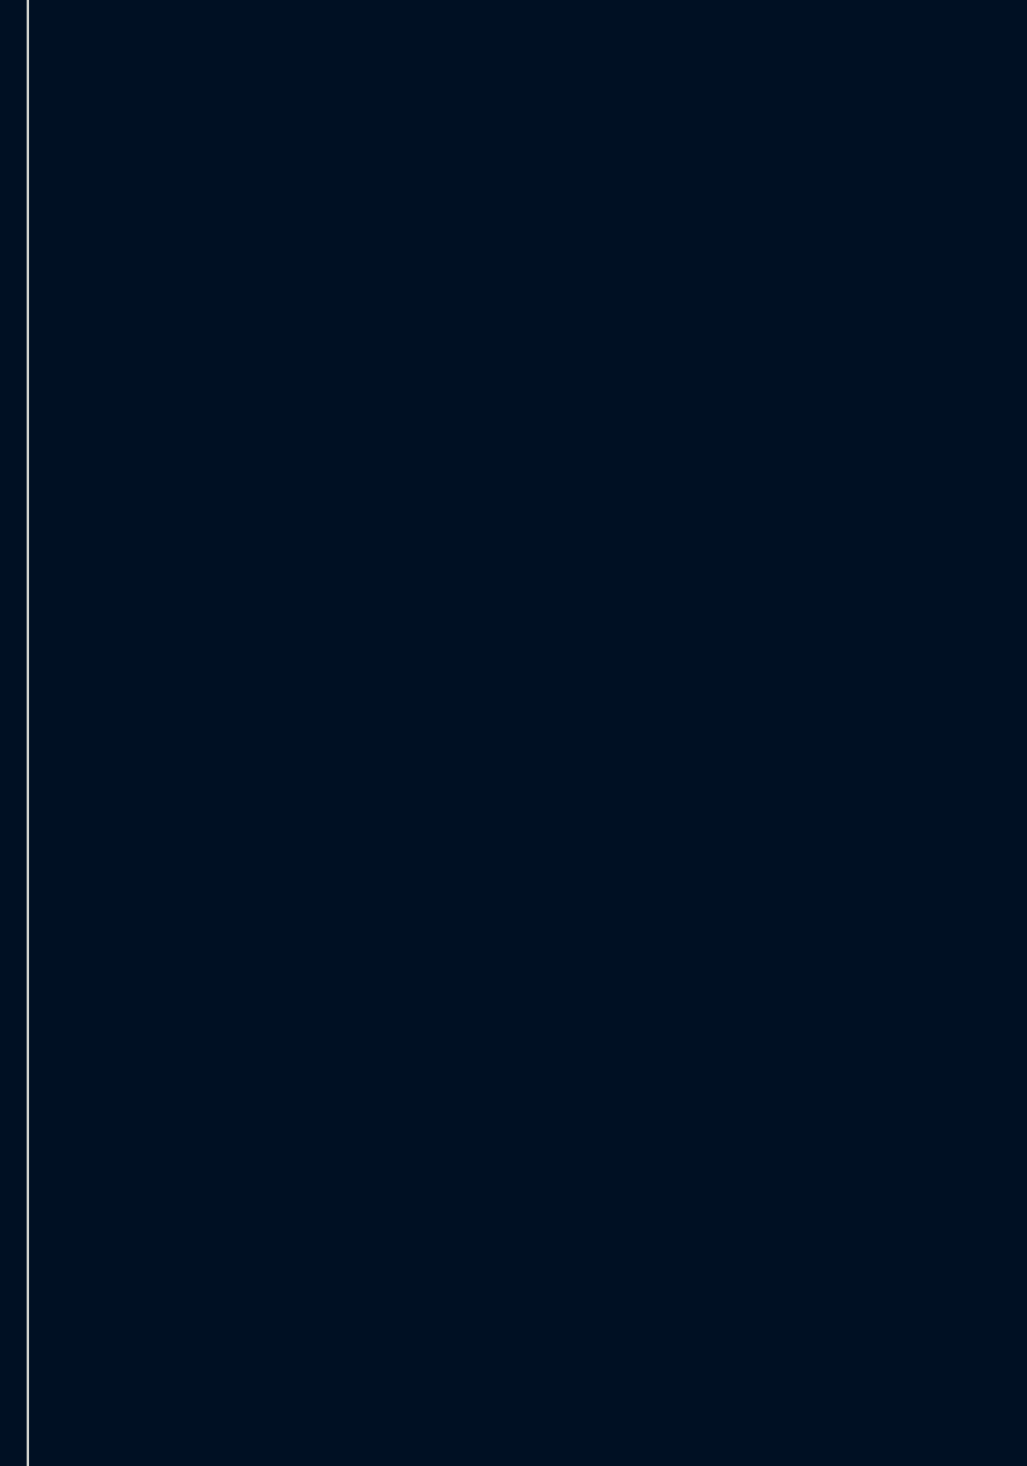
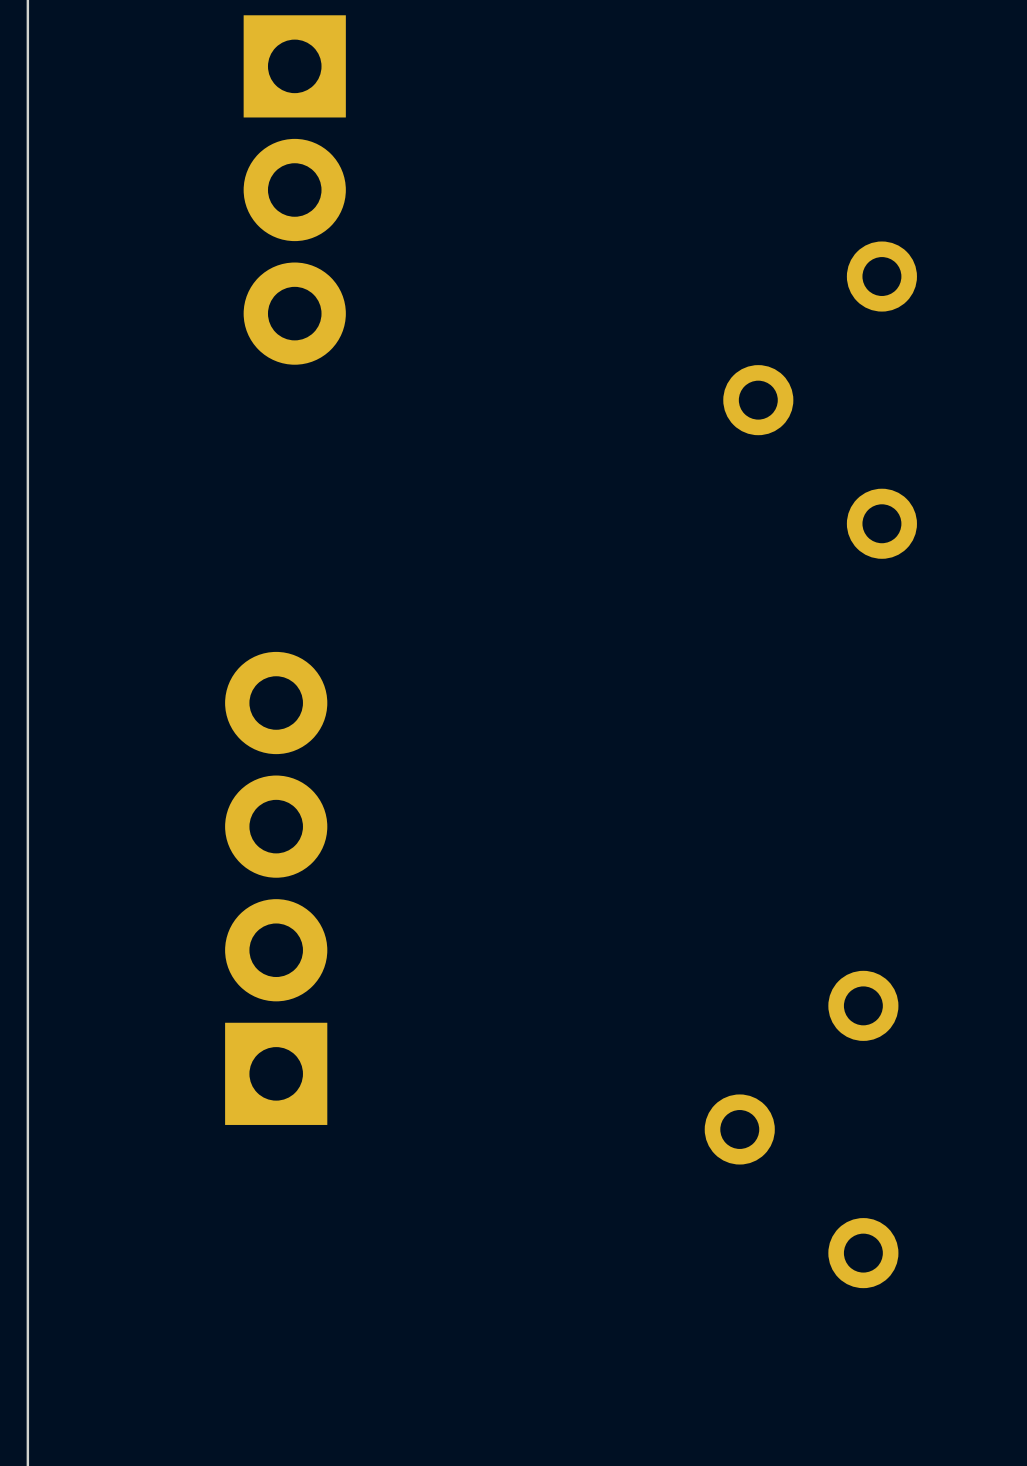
part: none -> (294, 189)
part: none -> (820, 400)
part: none -> (276, 888)
part: none -> (801, 1129)

